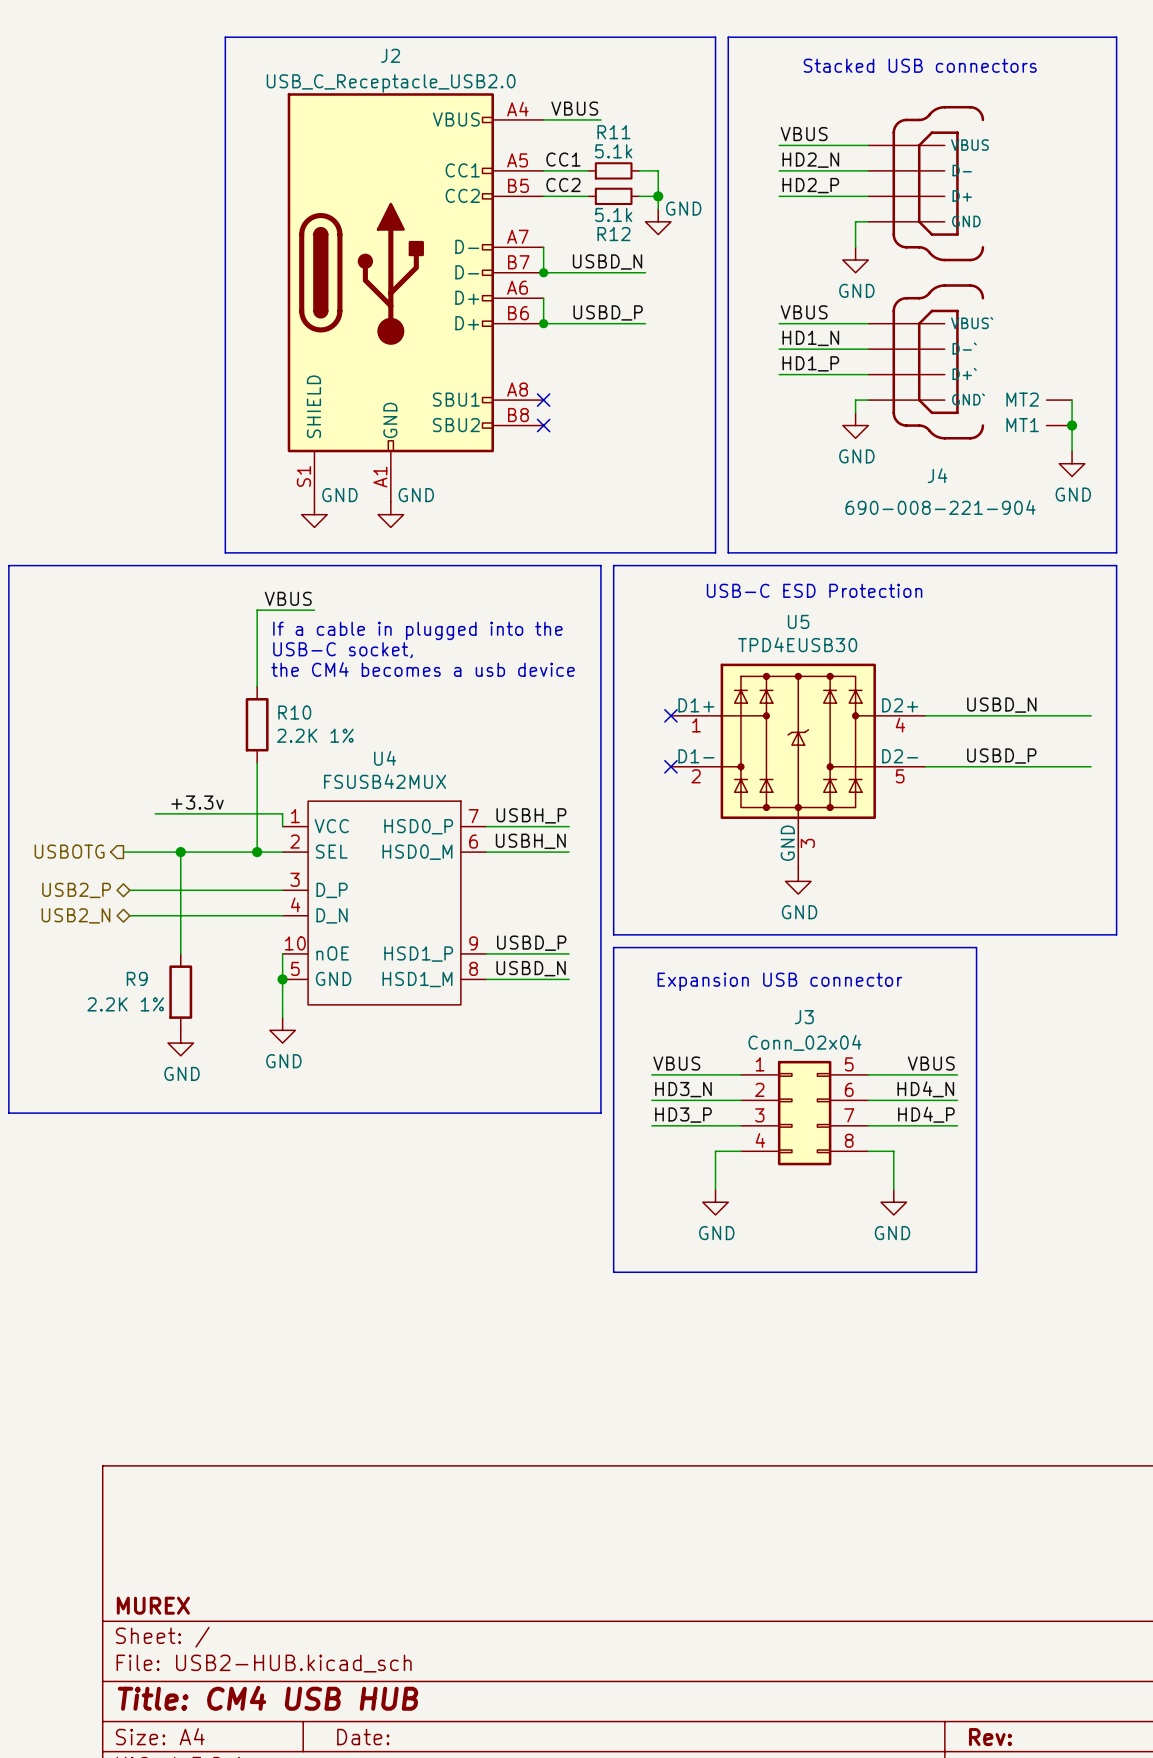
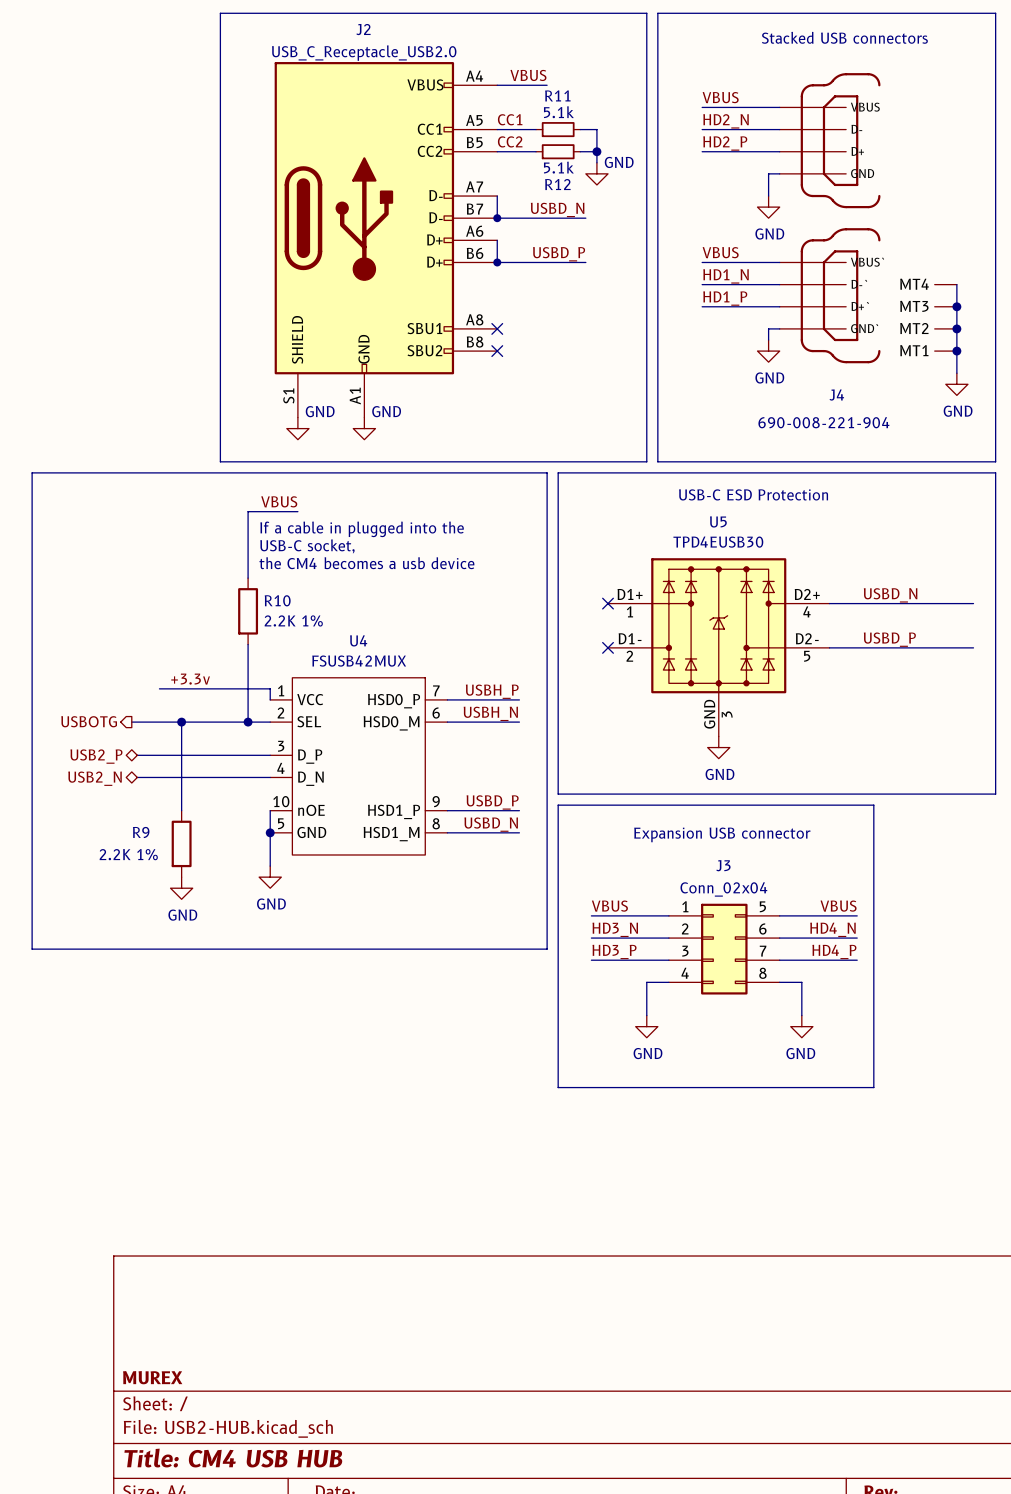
J4 symbol: [868, 105, 1073, 440] -> [779, 73, 957, 364]
wire: none -> (956, 284) (956, 328)
junction: none -> (956, 306)
junction: none -> (956, 328)

